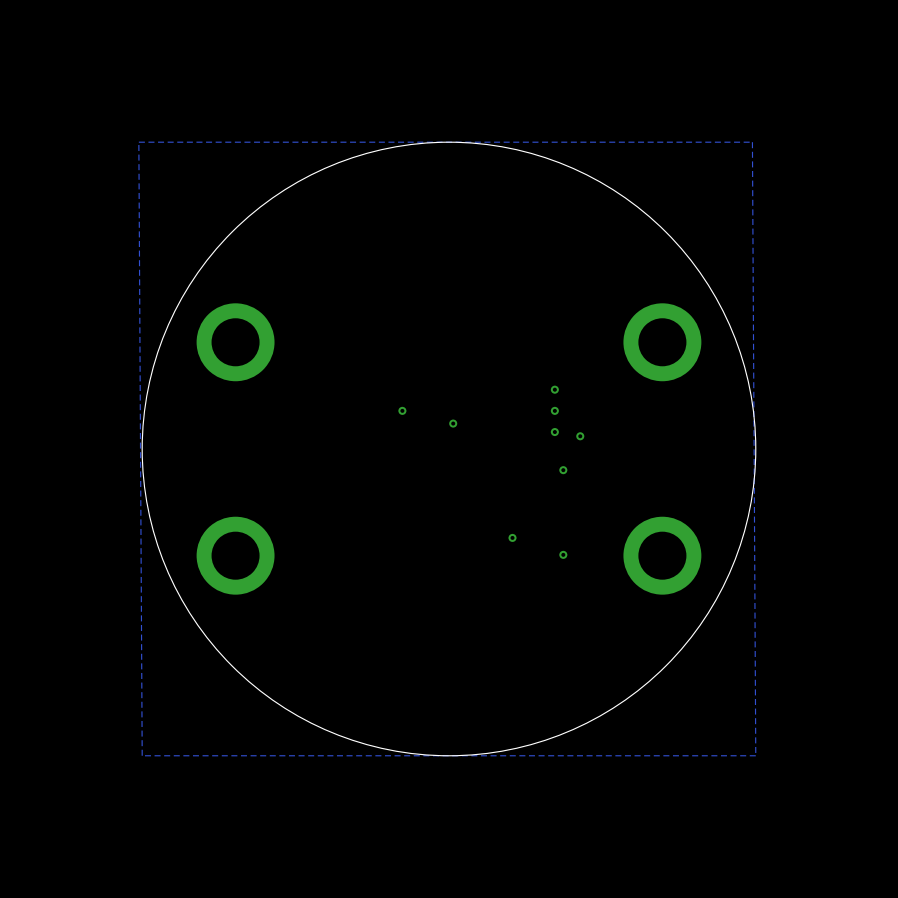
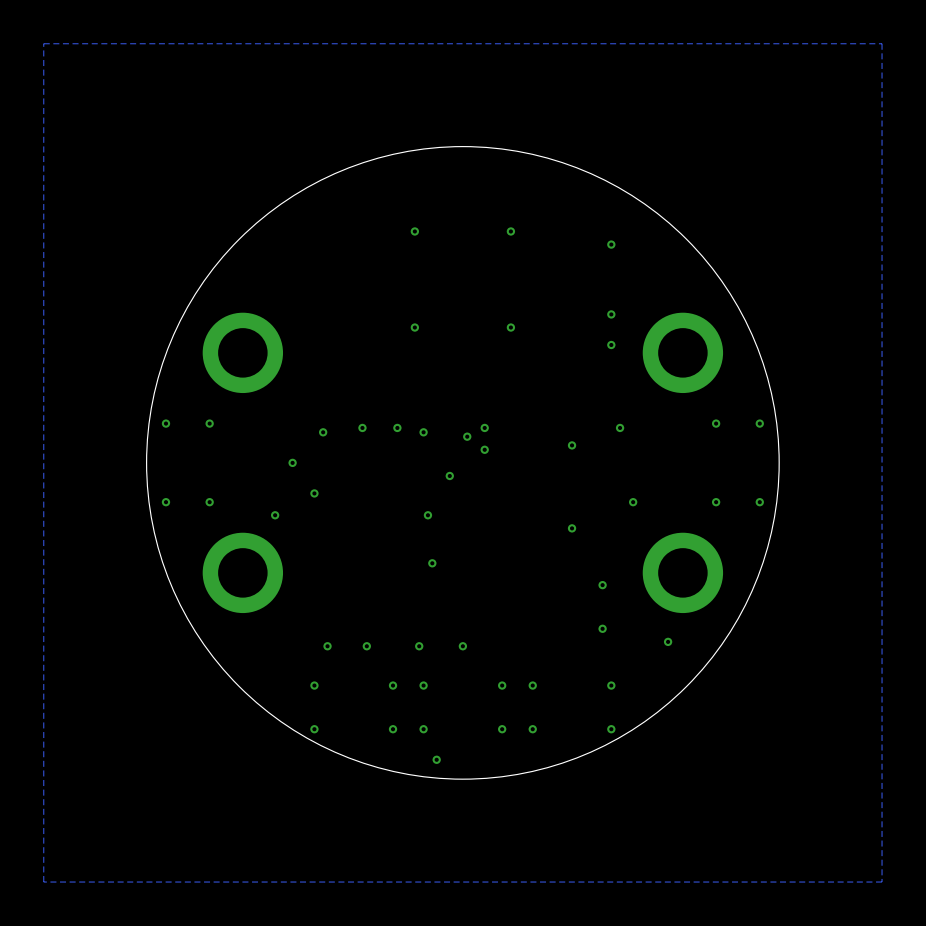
zone outline: (752, 142) (138, 142) (142, 755) (755, 755) (752, 142) -> (882, 43) (882, 882) (43, 882) (43, 43) (882, 43)
via: none -> (414, 231)
via: none -> (510, 231)
via: none -> (611, 244)
via: none -> (611, 314)
via: none -> (414, 327)
via: none -> (510, 327)
via: none -> (611, 344)
via: (554, 389) -> none
via: none -> (165, 423)
via: none -> (209, 423)
via: (402, 410) -> none
via: (554, 410) -> none
via: none -> (716, 423)
via: none -> (759, 423)
via: none -> (362, 427)
via: none -> (397, 427)
via: none -> (484, 427)
via: none -> (620, 427)
via: none -> (323, 432)
via: none -> (423, 432)
via: none -> (484, 449)
via: (580, 436) -> none
via: none -> (292, 462)
via: none -> (449, 475)
via: (563, 470) -> none
via: none -> (314, 493)
via: none -> (165, 502)
via: none -> (209, 502)
via: none -> (633, 502)
via: none -> (716, 502)
via: none -> (759, 502)
via: none -> (275, 515)
via: none -> (427, 515)
via: none -> (572, 528)
via: (512, 537) -> none
via: none -> (432, 563)
via: (563, 554) -> none
via: none -> (602, 585)
via: none -> (602, 628)
via: none -> (668, 641)
via: none -> (327, 646)
via: none -> (366, 646)
via: none -> (419, 646)
via: none -> (462, 646)
via: none -> (314, 685)
via: none -> (393, 685)
via: none -> (423, 685)
via: none -> (502, 685)
via: none -> (532, 685)
via: none -> (611, 685)
via: none -> (314, 729)
via: none -> (393, 729)
via: none -> (423, 729)
via: none -> (502, 729)
via: none -> (532, 729)
via: none -> (611, 729)
via: none -> (436, 759)

